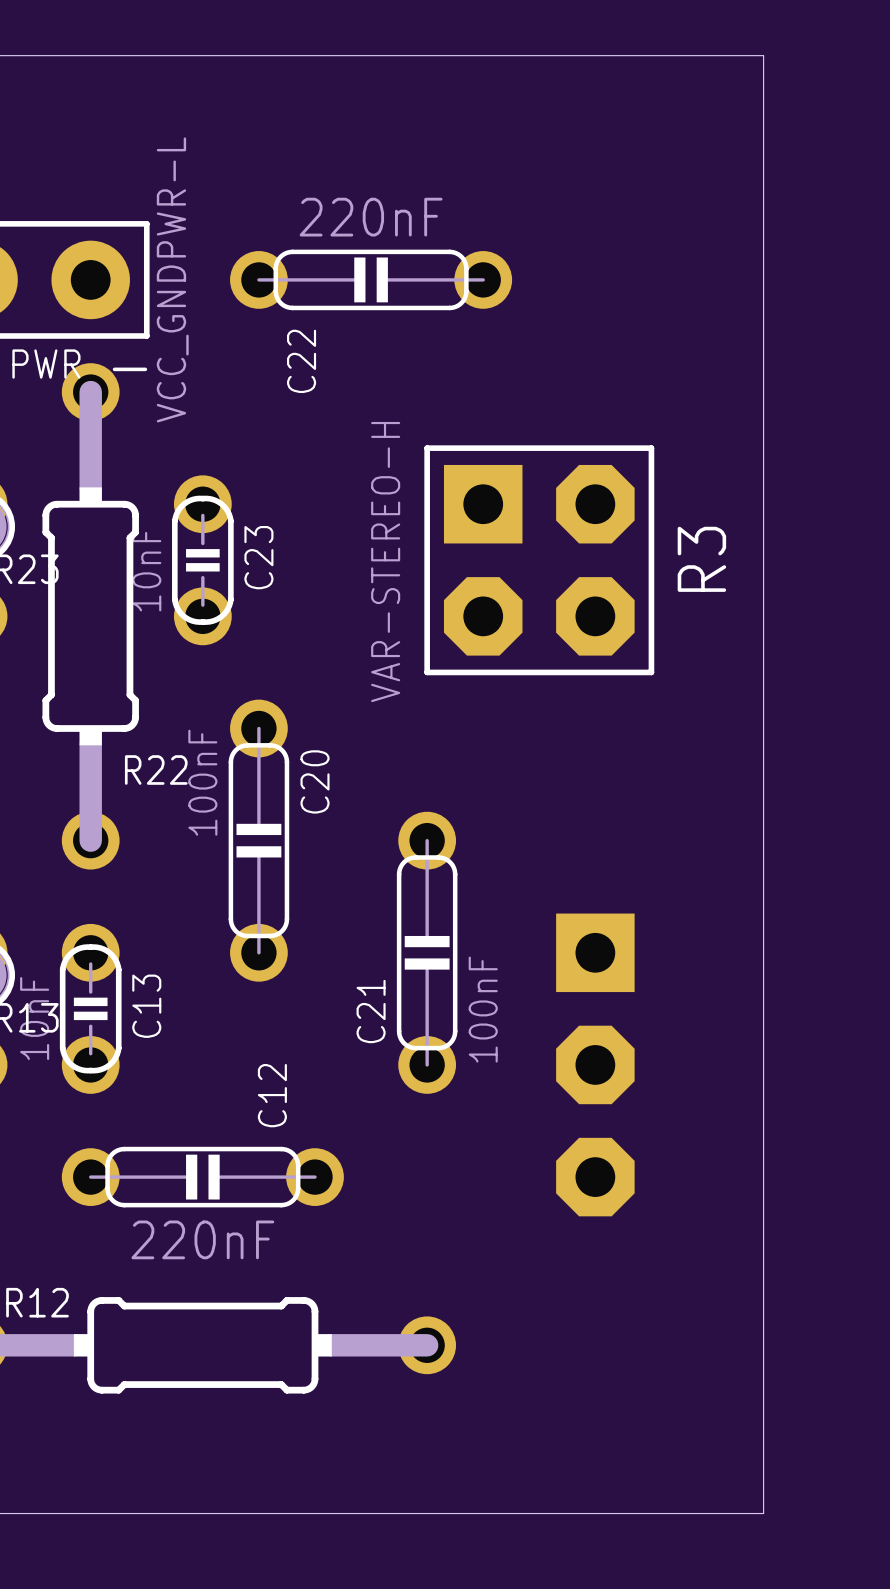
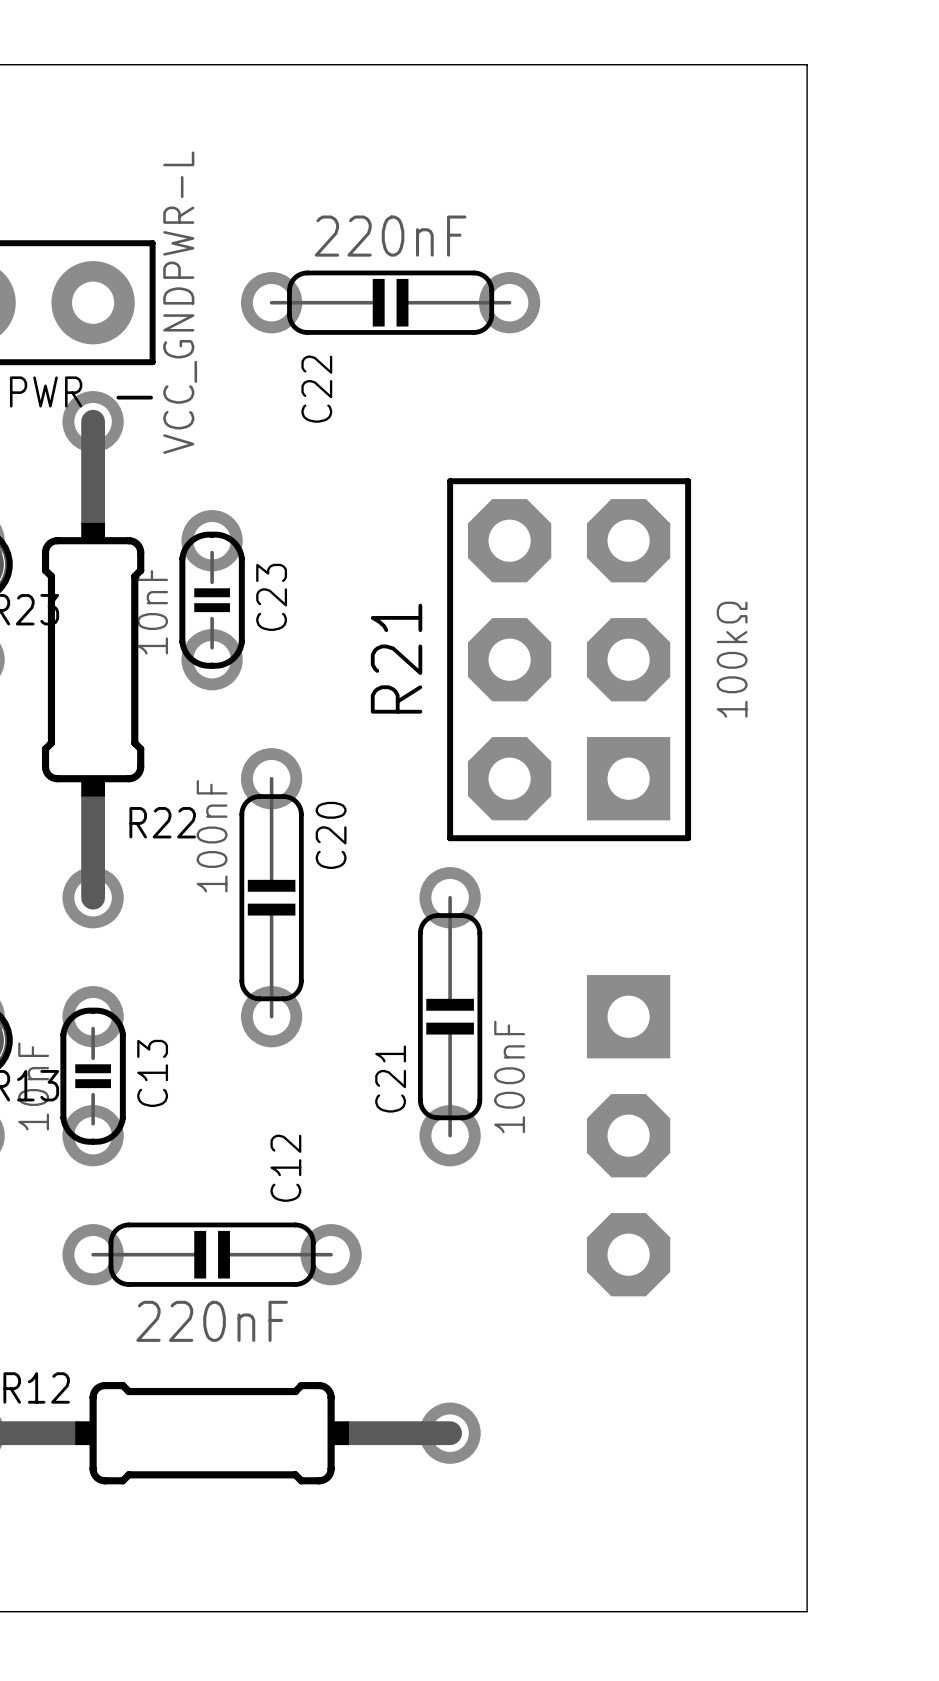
R3: VAR-STEREO-H (539, 560) -> none
R21: none -> 100kΩ (569, 659)

